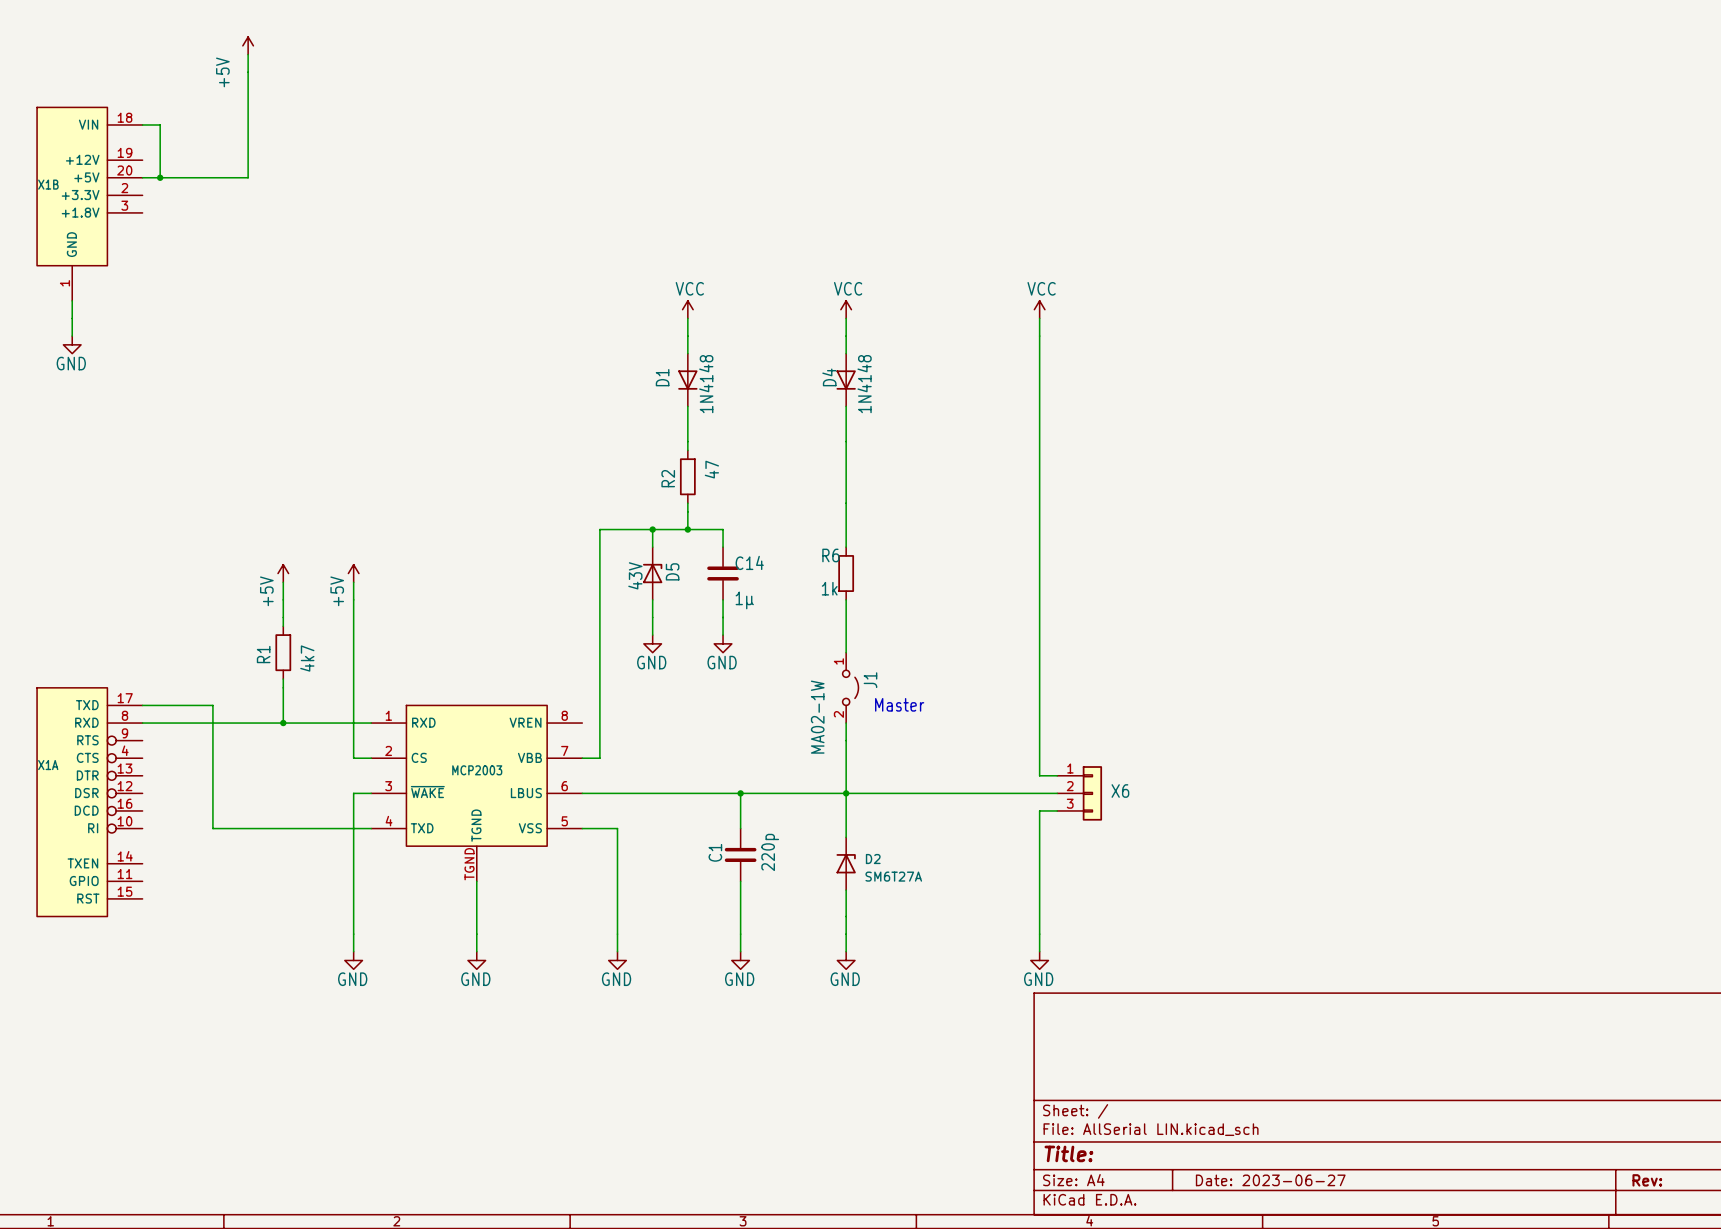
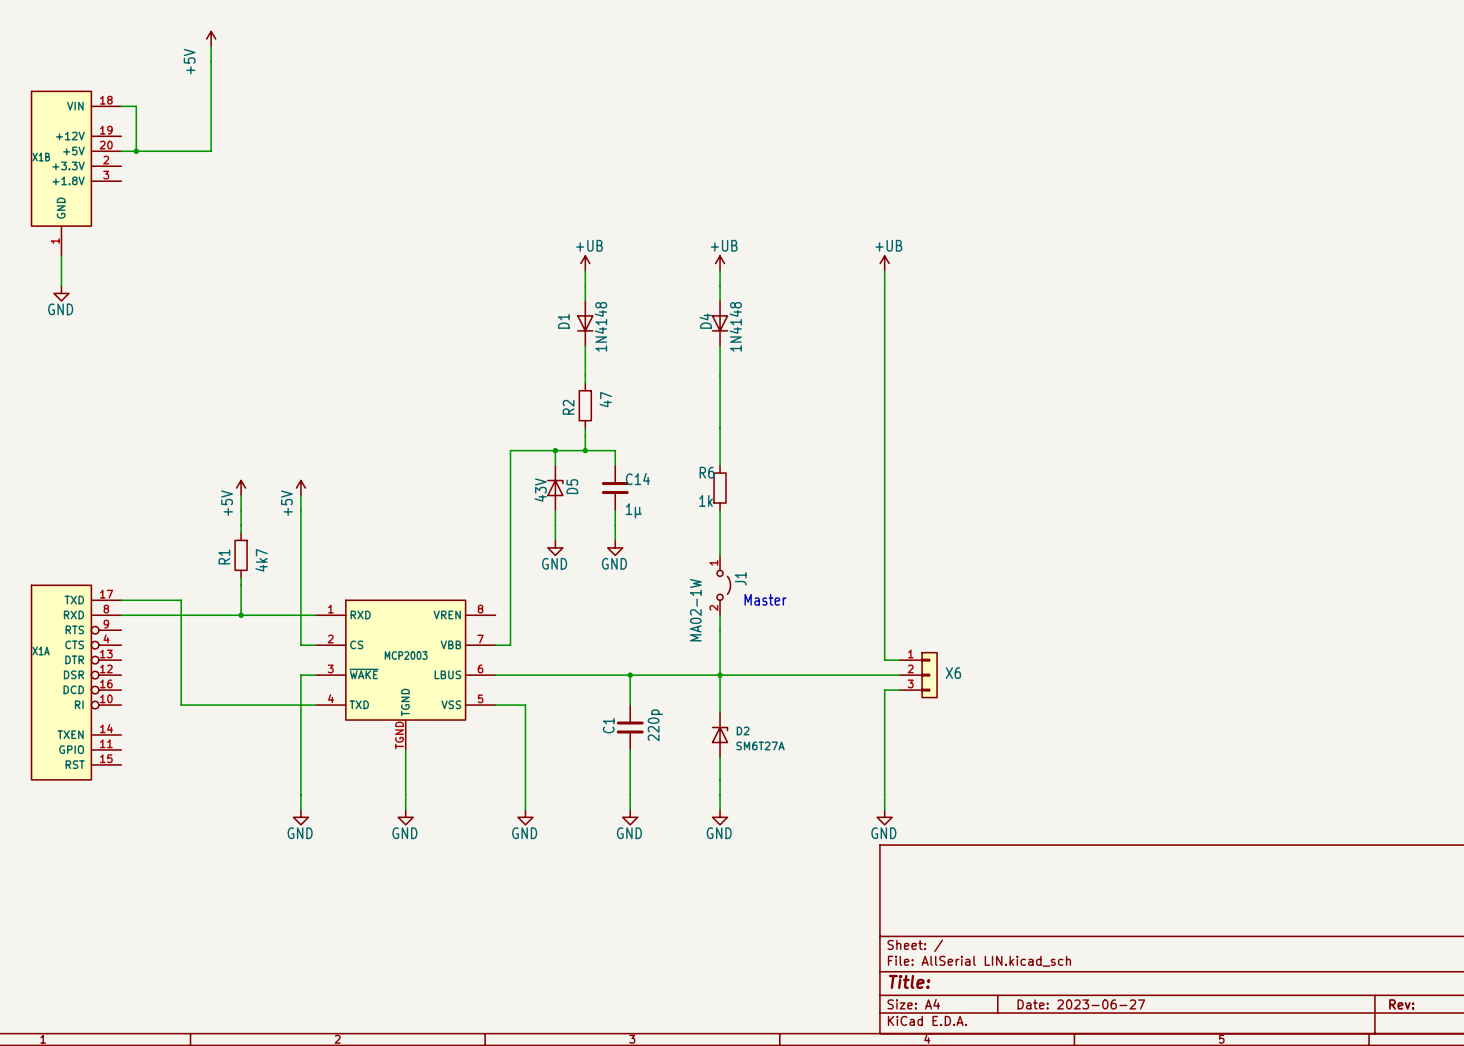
power symbol: VCC (687, 309) -> +UB (585, 263)
power symbol: VCC (846, 309) -> +UB (720, 263)
power symbol: VCC (1039, 309) -> +UB (884, 263)

